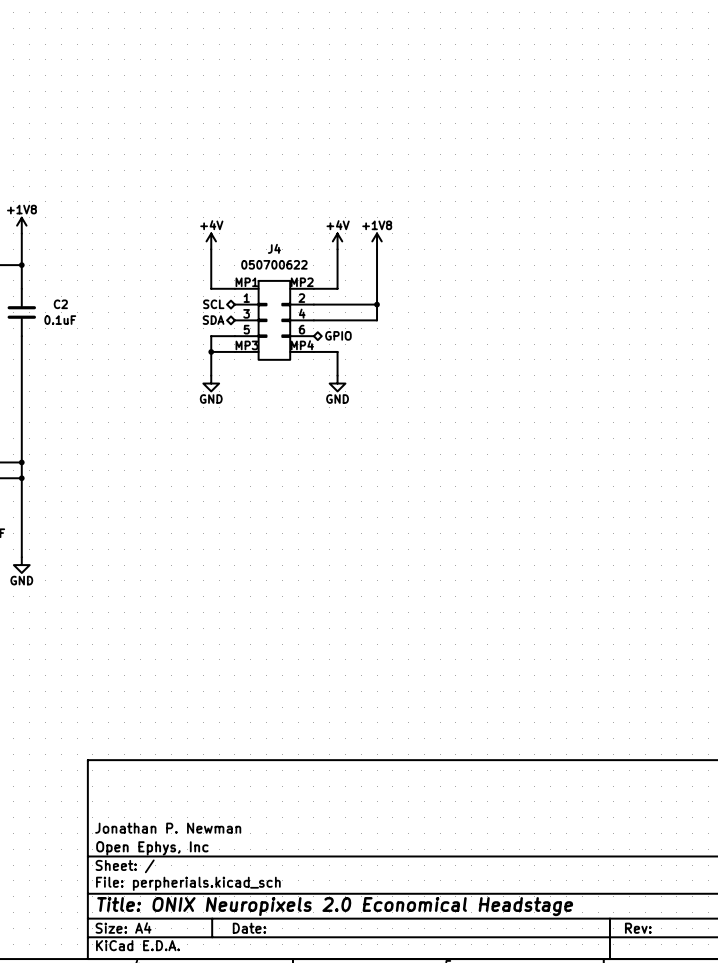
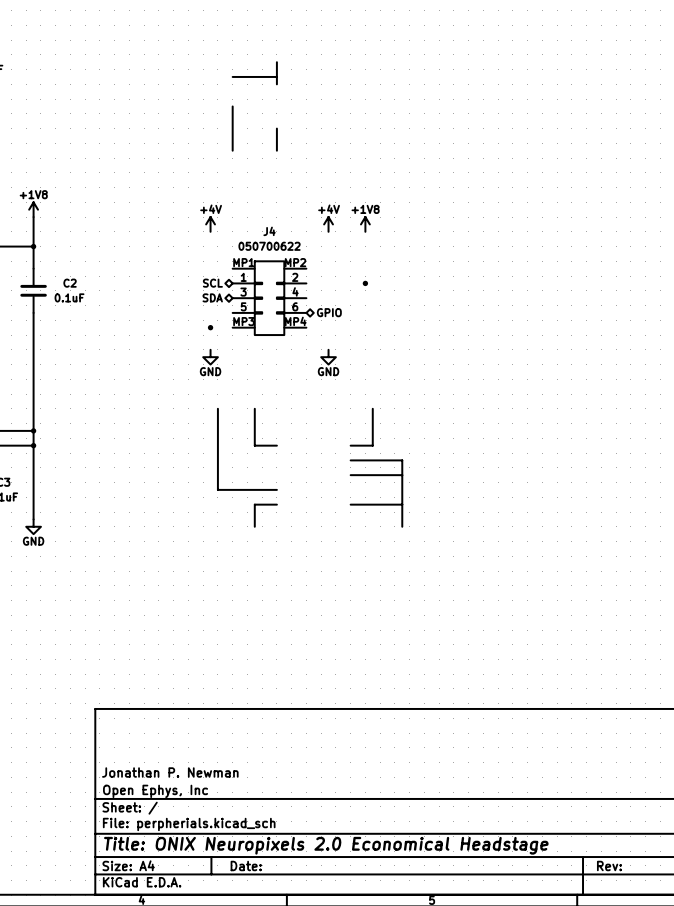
wire: none -> (276, 62) (276, 84)
wire: none -> (232, 76) (276, 76)
wire: none -> (232, 106) (232, 150)
wire: none -> (276, 128) (276, 150)
wire: (211, 249) (211, 288) (234, 288) -> none
wire: (337, 249) (337, 288) (313, 288) -> none
wire: (377, 249) (377, 320) (313, 320) -> none
wire: (313, 304) (377, 304) -> none
wire: (234, 336) (211, 336) (211, 375) -> none
wire: (211, 351) (234, 351) -> none
wire: (313, 351) (337, 351) (337, 375) -> none
wire: none -> (217, 408) (217, 489) (276, 489)
wire: none -> (254, 408) (254, 445) (276, 445)
wire: none -> (372, 408) (372, 445) (350, 445)
wire: none -> (350, 460) (402, 460) (402, 526)
wire: none -> (350, 475) (402, 475)
wire: none -> (276, 504) (254, 504) (254, 526)
wire: none -> (350, 504) (402, 504)

